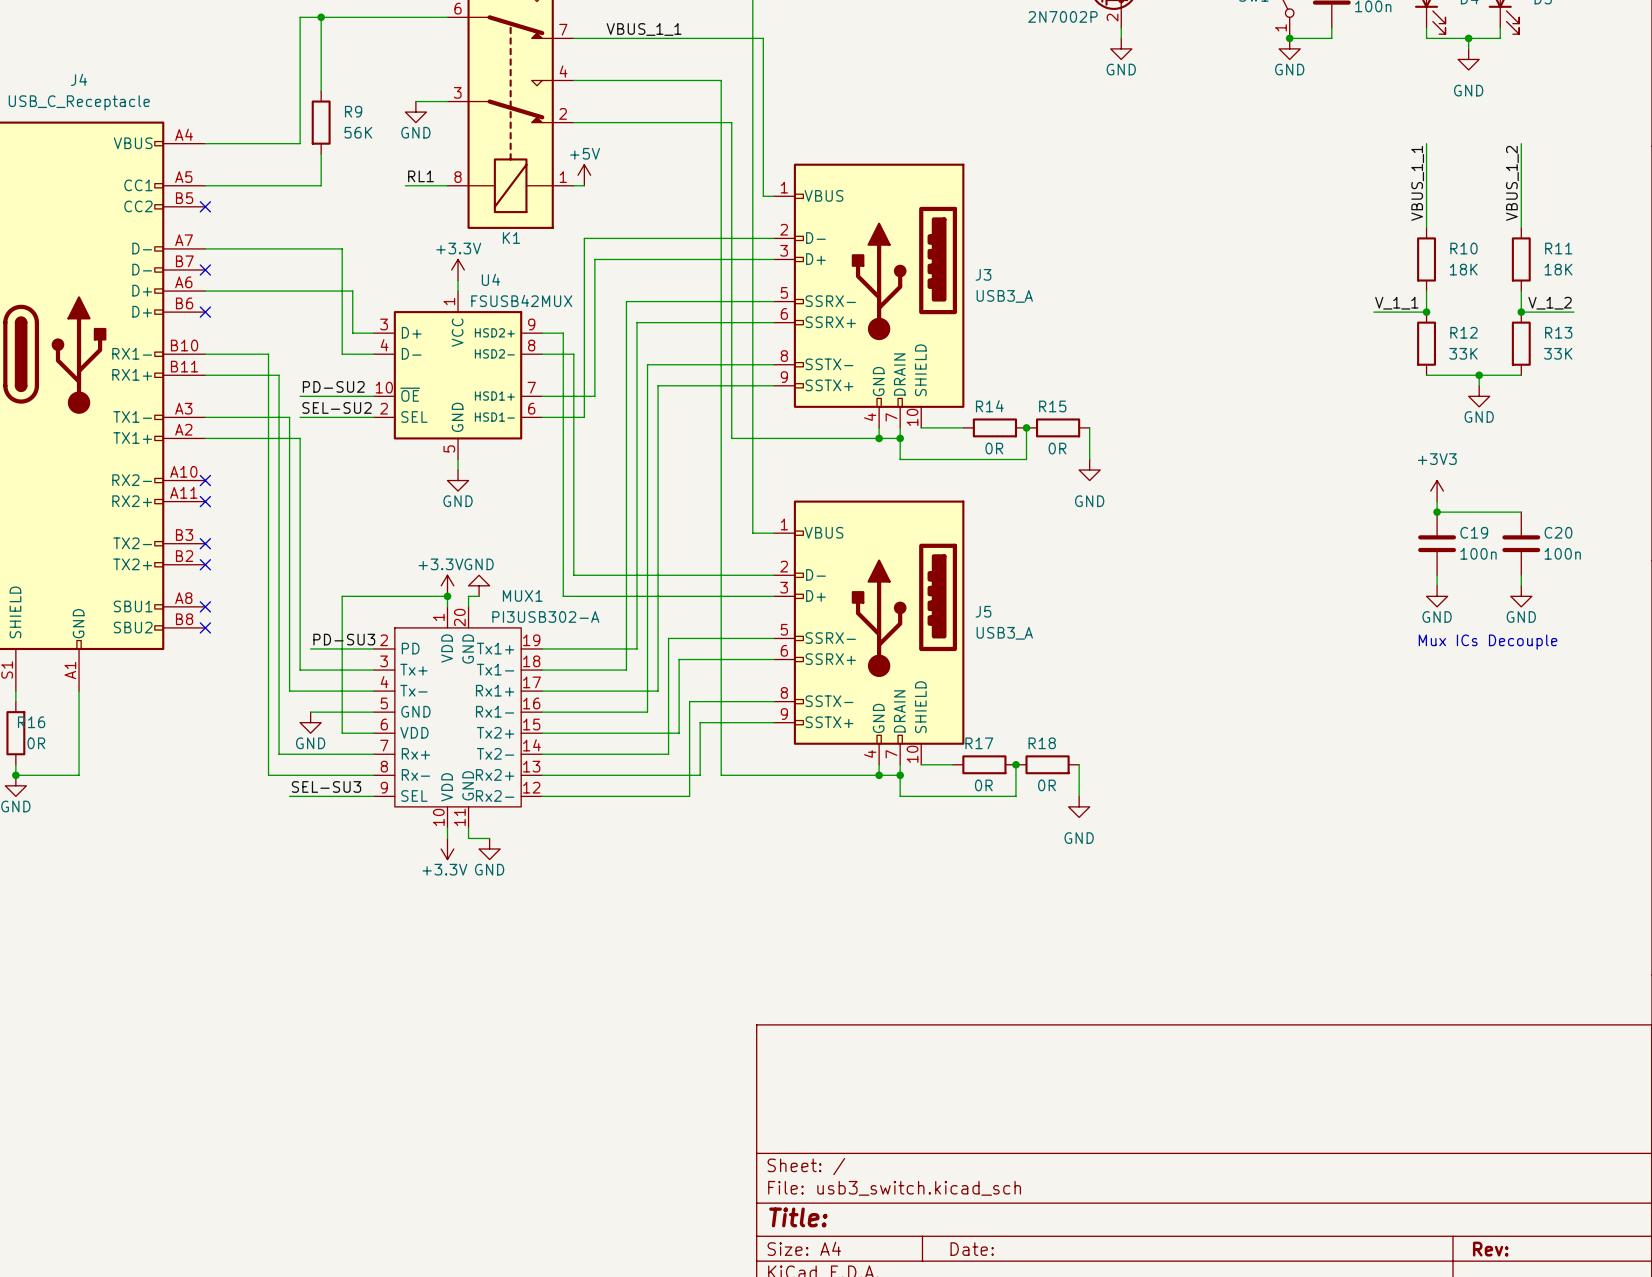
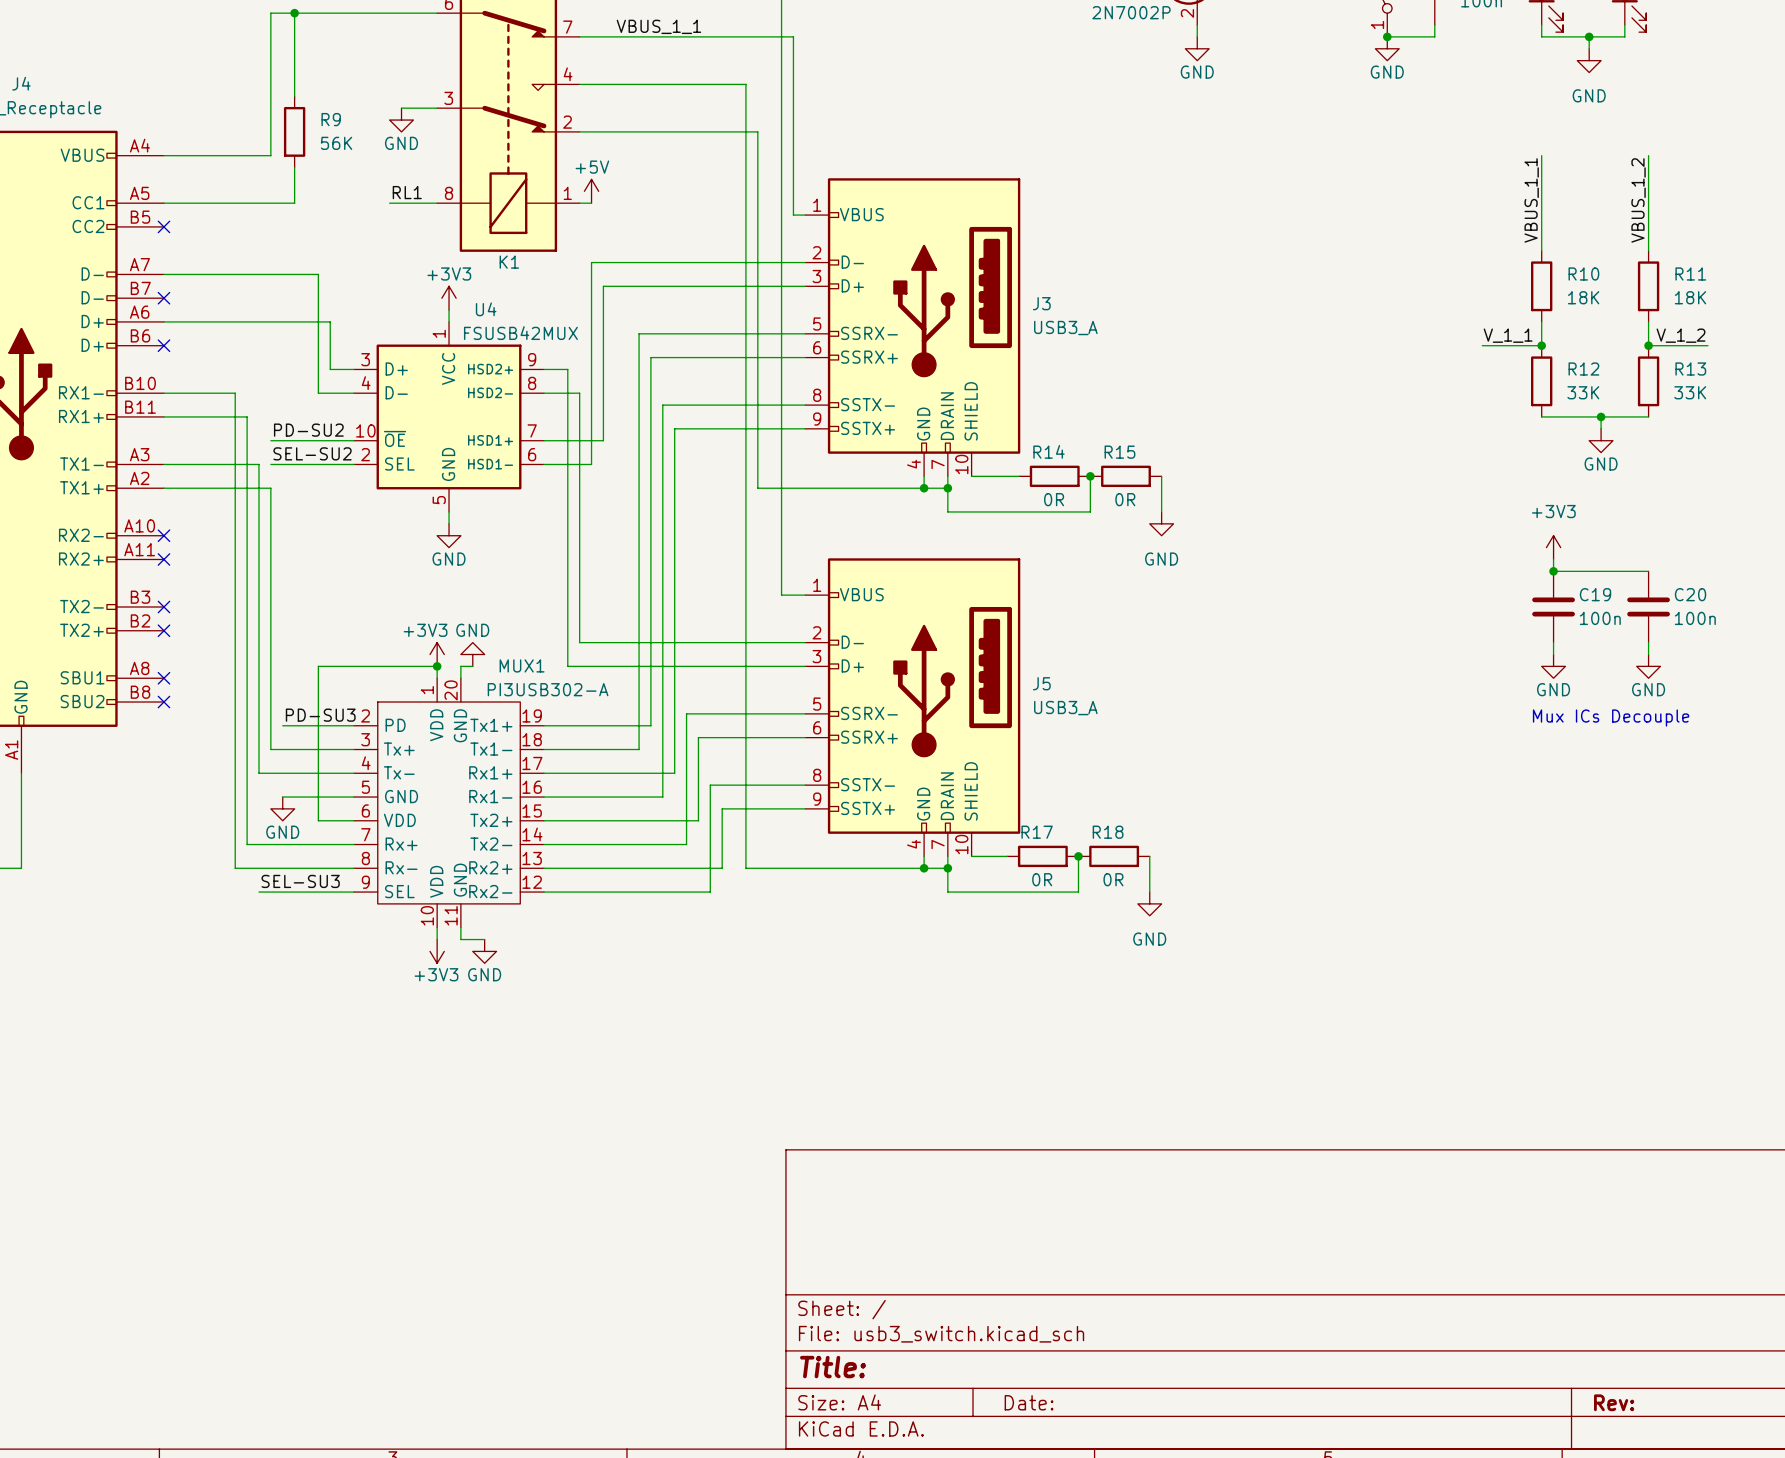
power symbol: +3.3V (458, 269) -> +3V3 (449, 298)
power symbol: +3.3V (447, 585) -> +3V3 (437, 654)
power symbol: +3.3V (447, 849) -> +3V3 (437, 951)

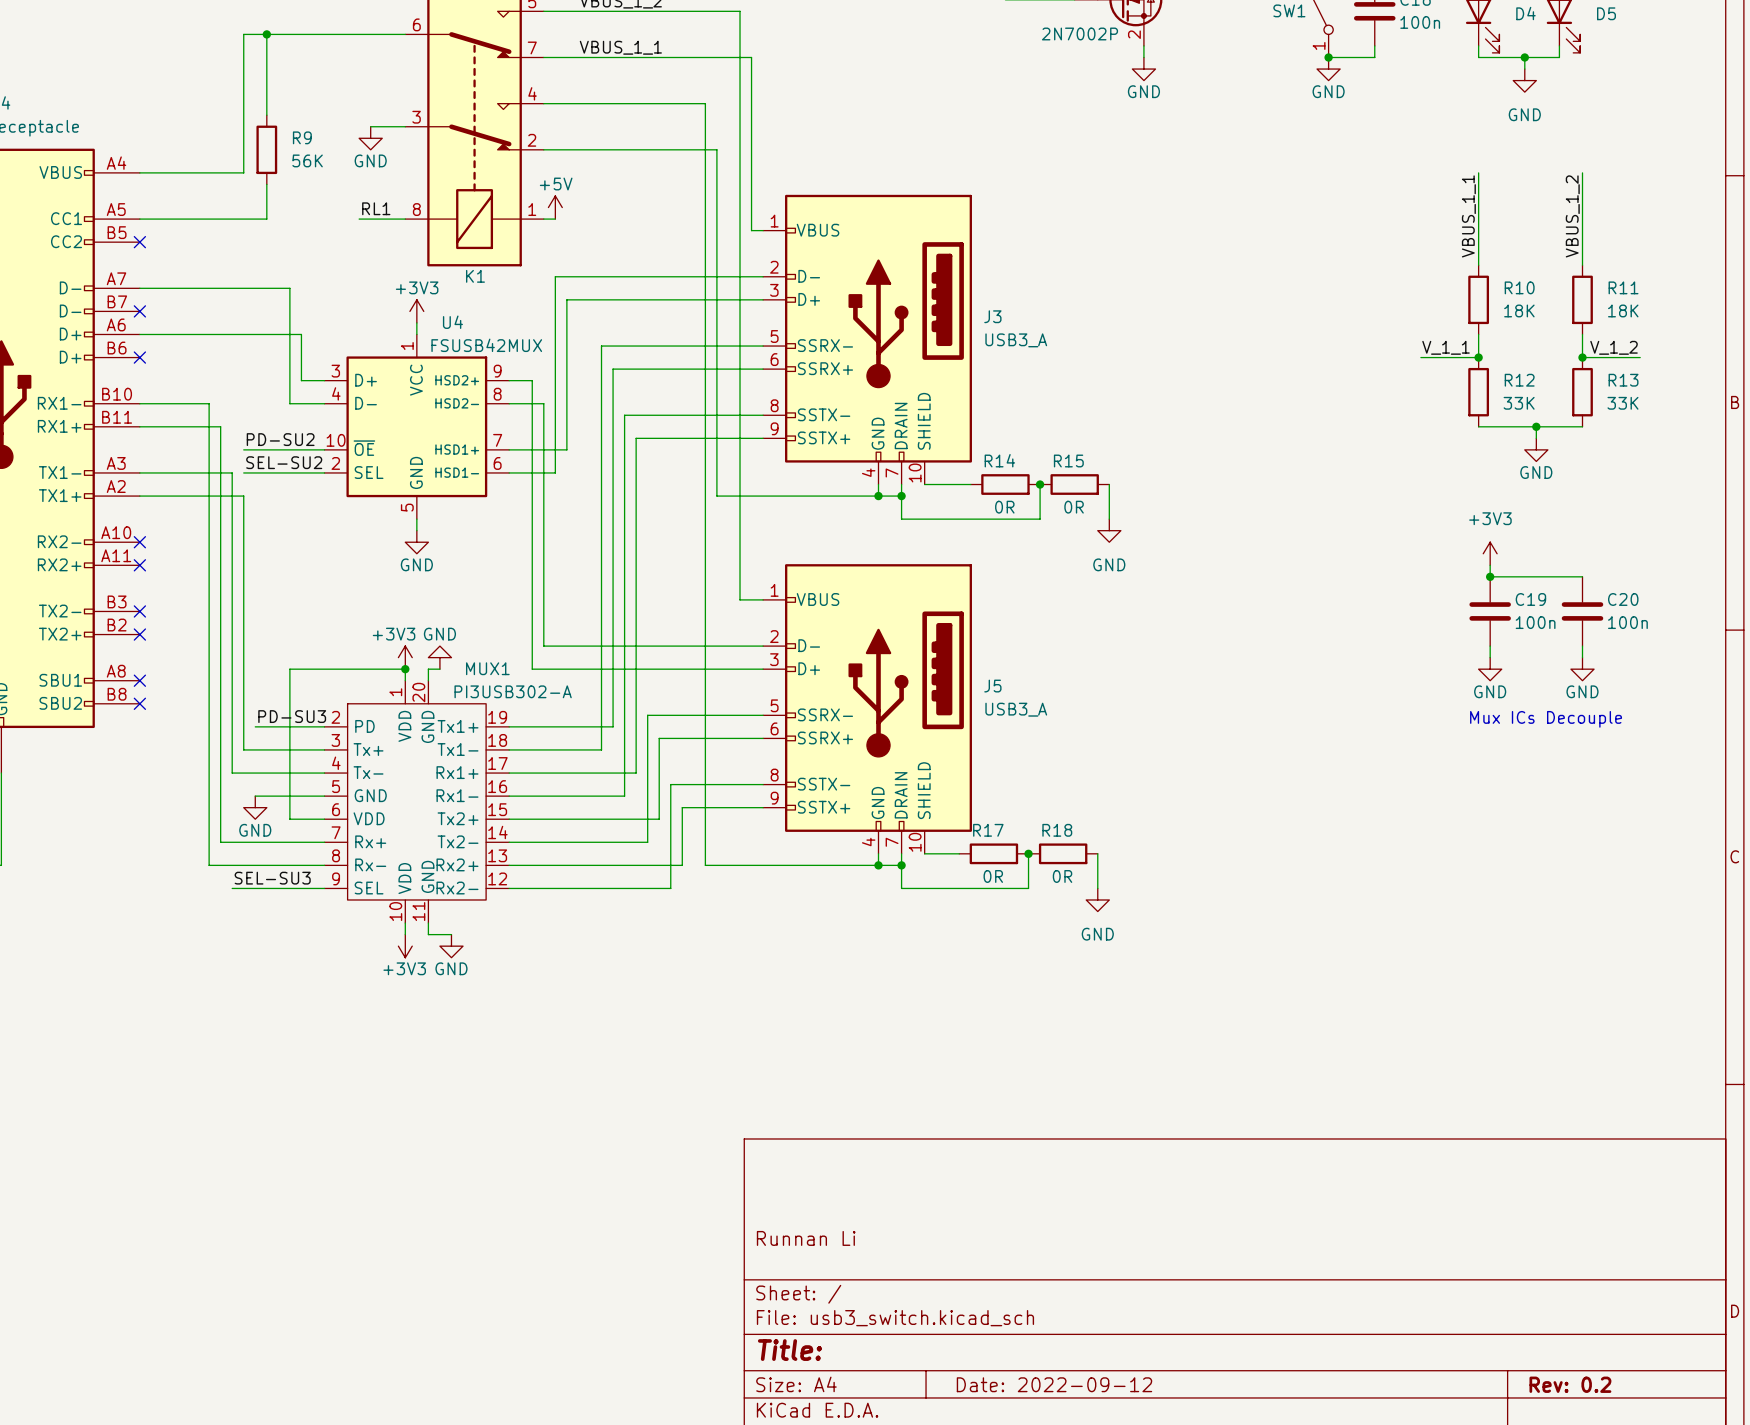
title block: none -> Runnan Li (806, 1238)
title block: Date: (1029, 1402) -> Date: 2022-09-12 (1054, 1384)
title block: Rev: (1614, 1402) -> Rev: 0.2 (1570, 1384)

